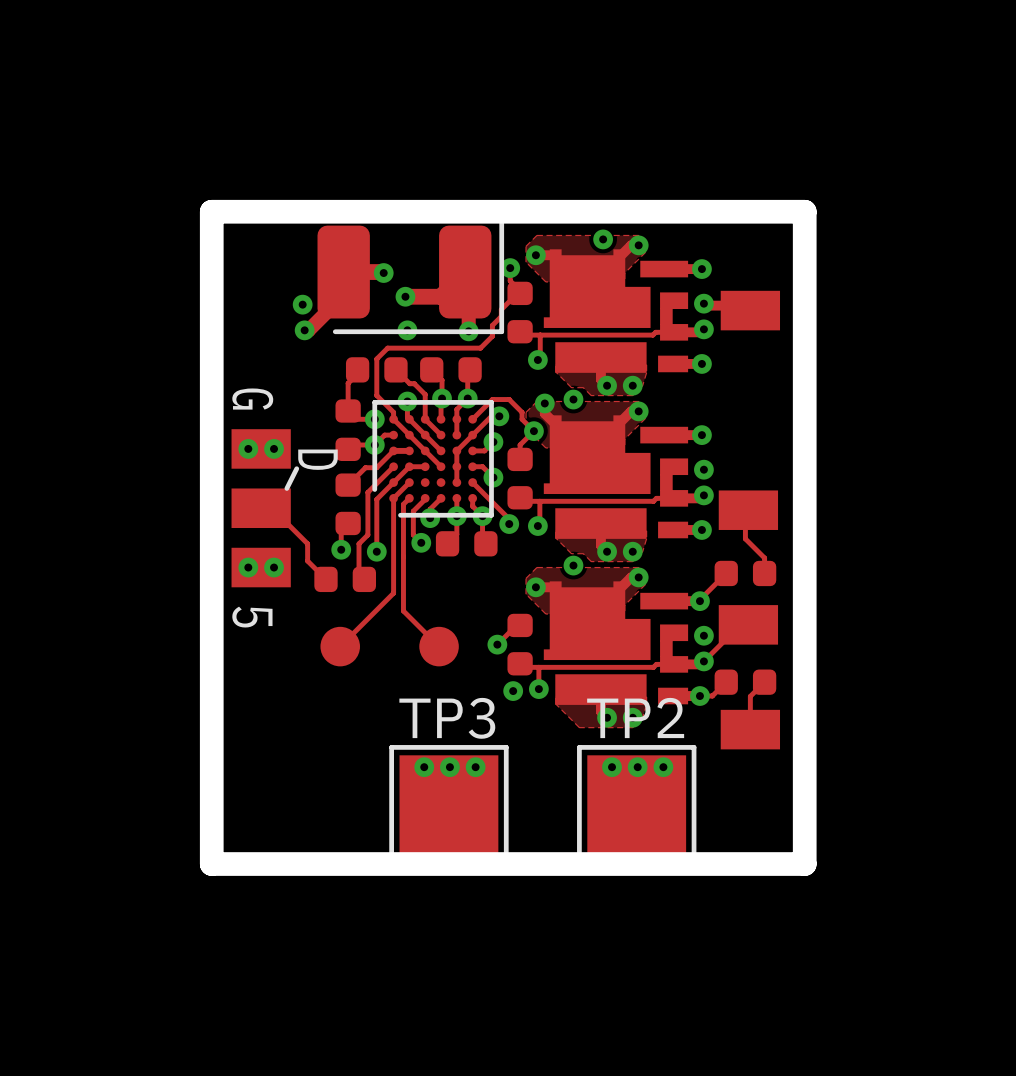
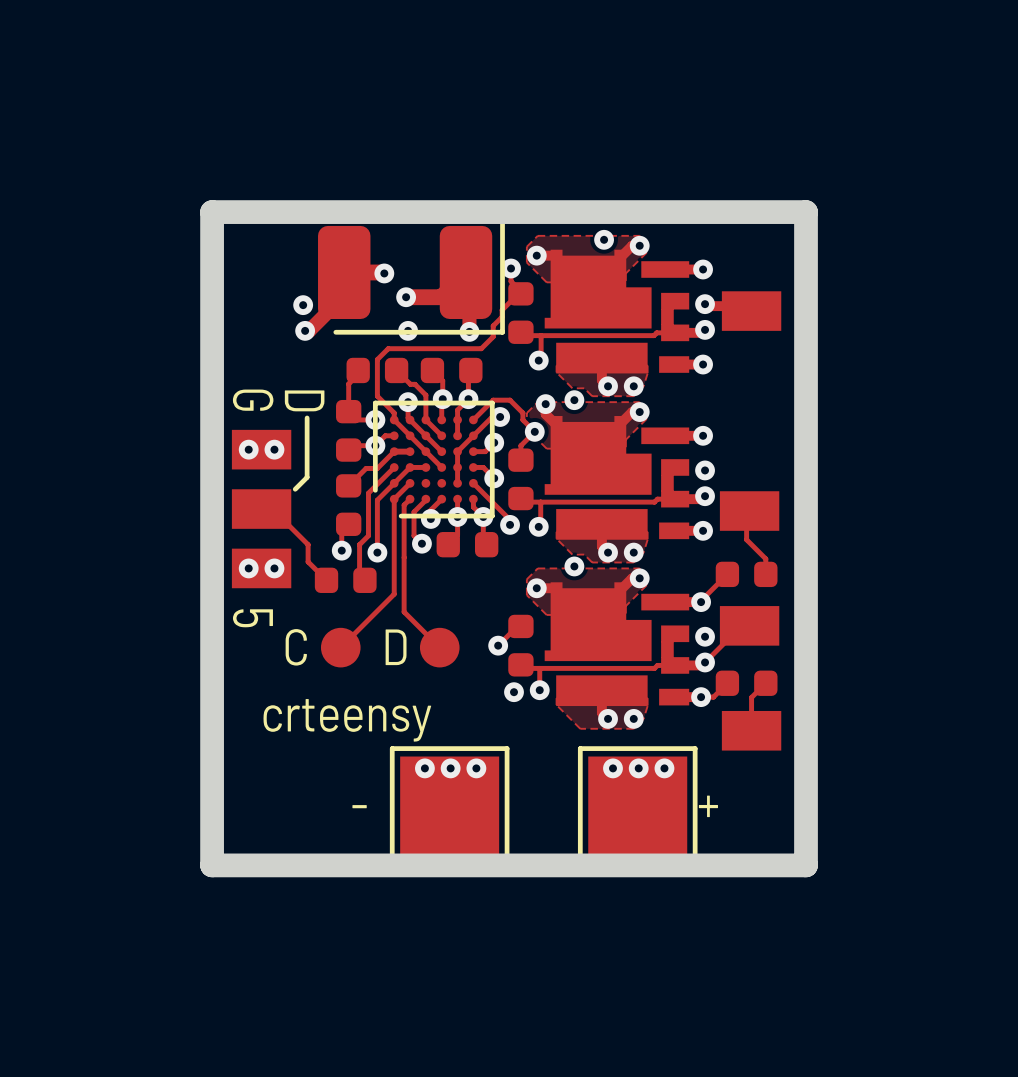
line: none -> (307, 417) (307, 477) (295, 489)
text position: D (317, 459) -> D (304, 400)
line: (296, 468) (286, 488) -> none
text: none -> C (296, 647)
text: none -> D (396, 647)
text: none -> crteensy (347, 720)
TP2 name: TP2 (635, 717) -> none
TP3 name: TP3 (447, 718) -> none
text: none -> - (359, 806)
text: none -> + (708, 806)

